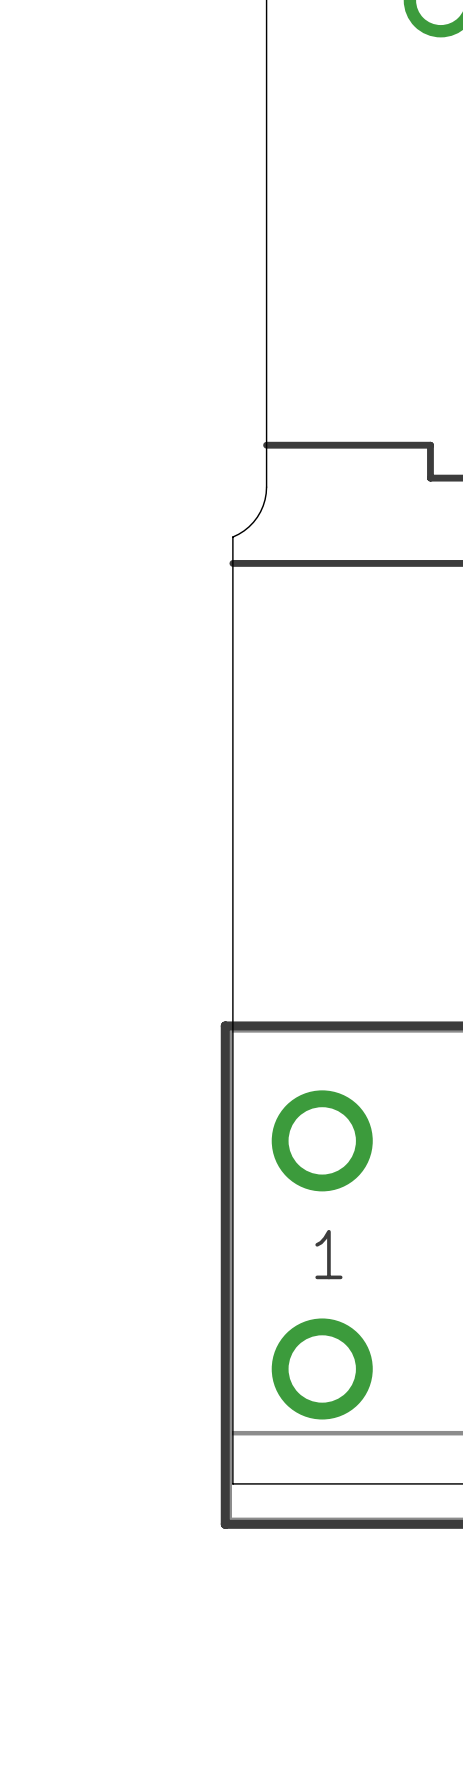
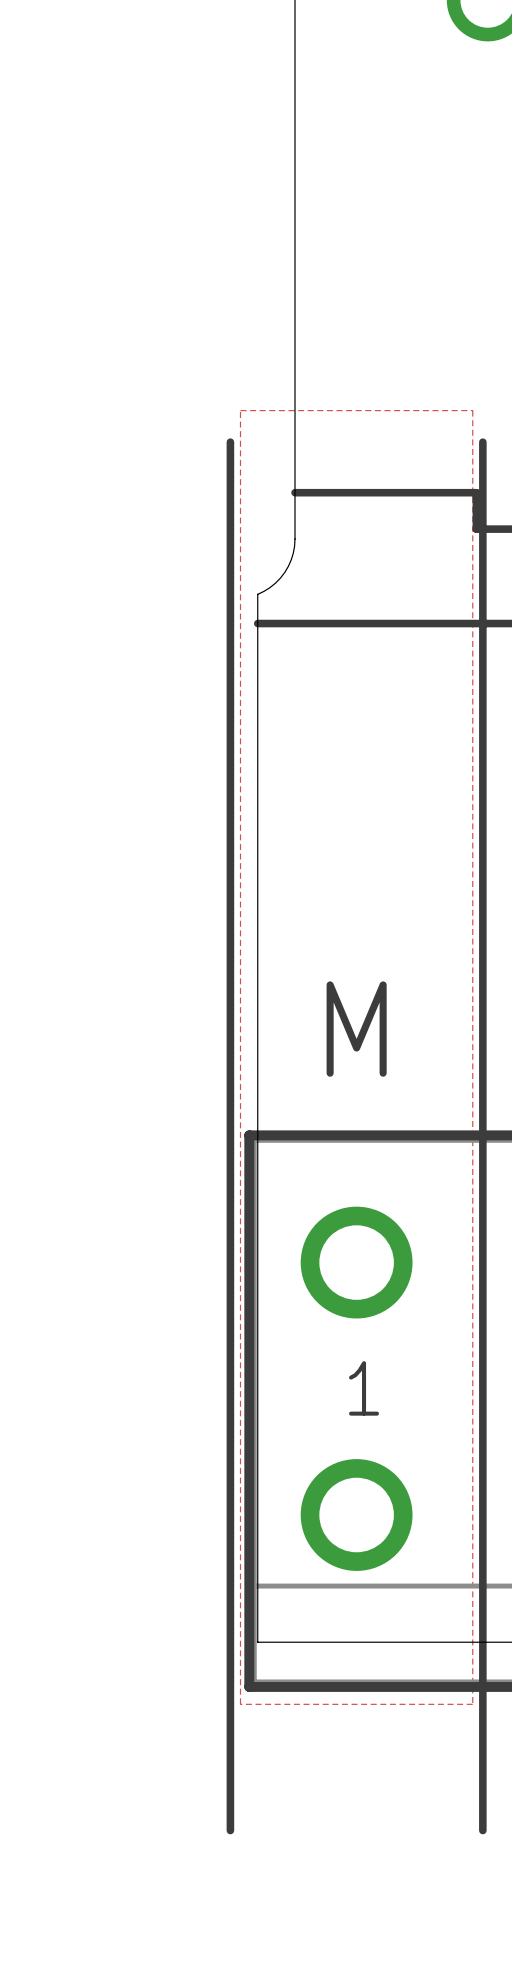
top zone outline: none -> (240, 410) (472, 410) (472, 1704) (240, 1704) (240, 410)
line: none -> (230, 442) (230, 1830)
line: none -> (482, 442) (482, 1830)
text: none -> M (356, 1029)

